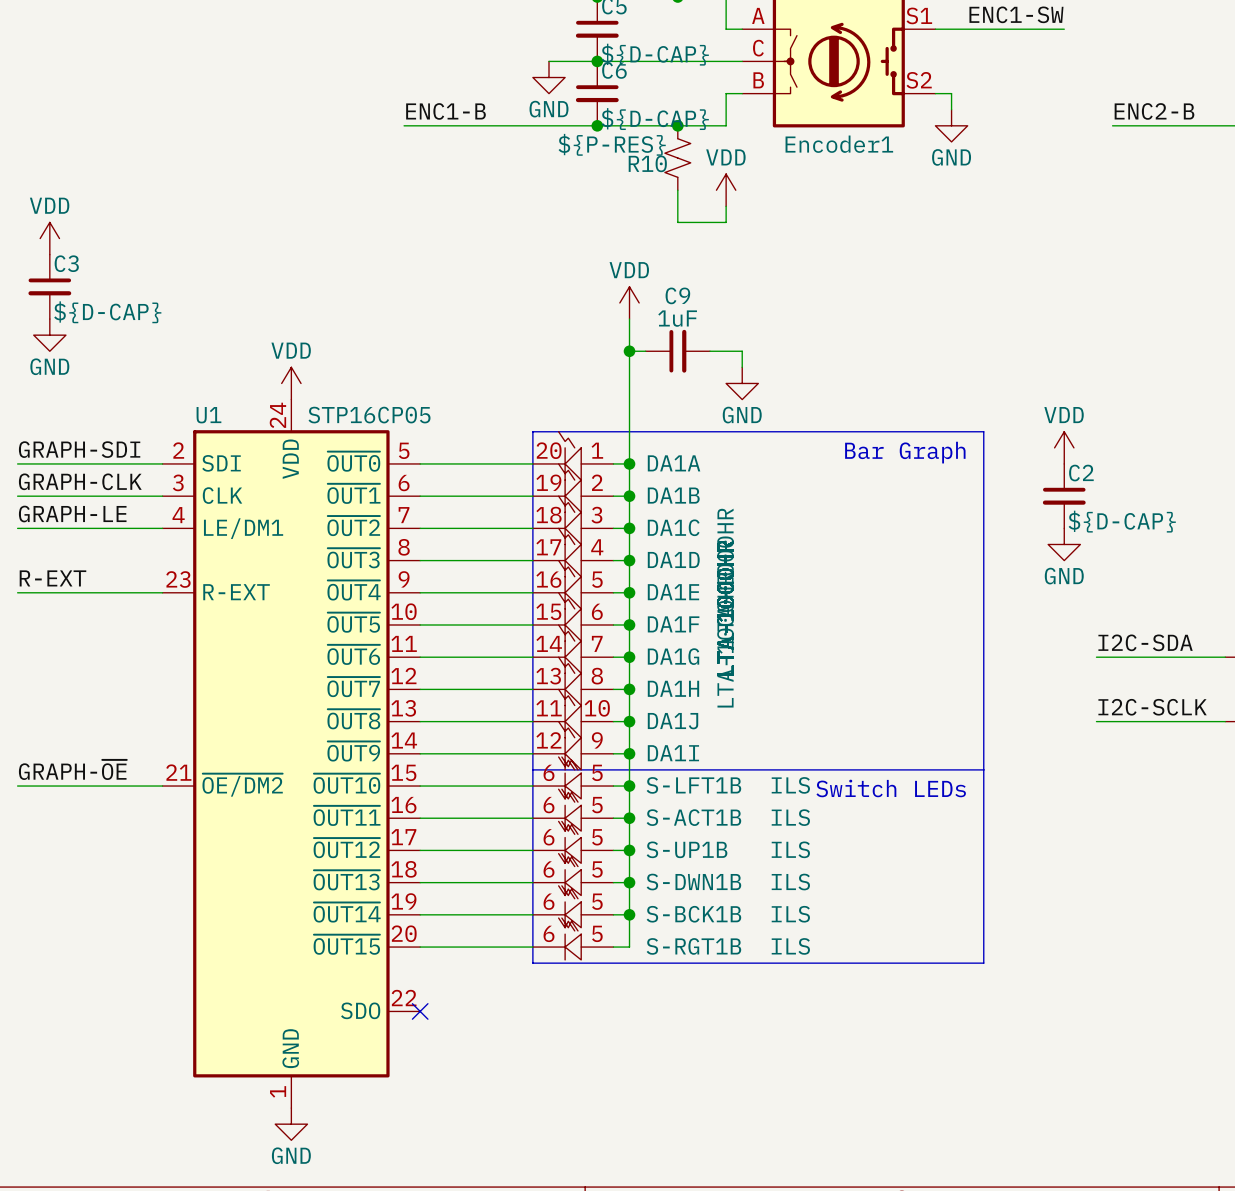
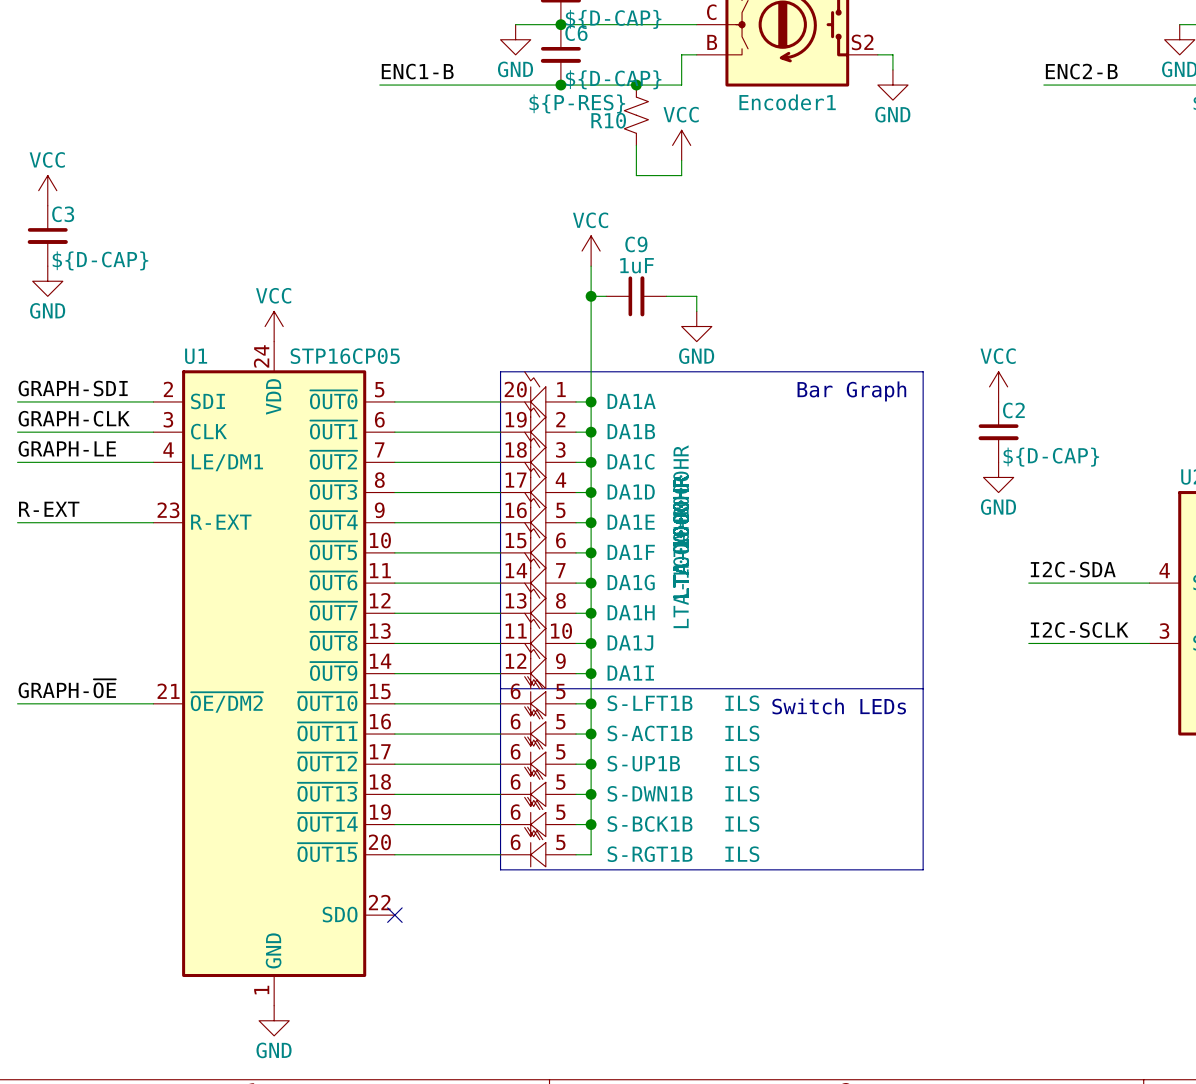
power symbol: VDD (726, 190) -> VCC (681, 145)
power symbol: VDD (49, 238) -> VCC (47, 190)
power symbol: VDD (629, 302) -> VCC (591, 251)
power symbol: VDD (291, 383) -> VCC (274, 326)
power symbol: VDD (1064, 447) -> VCC (998, 386)

